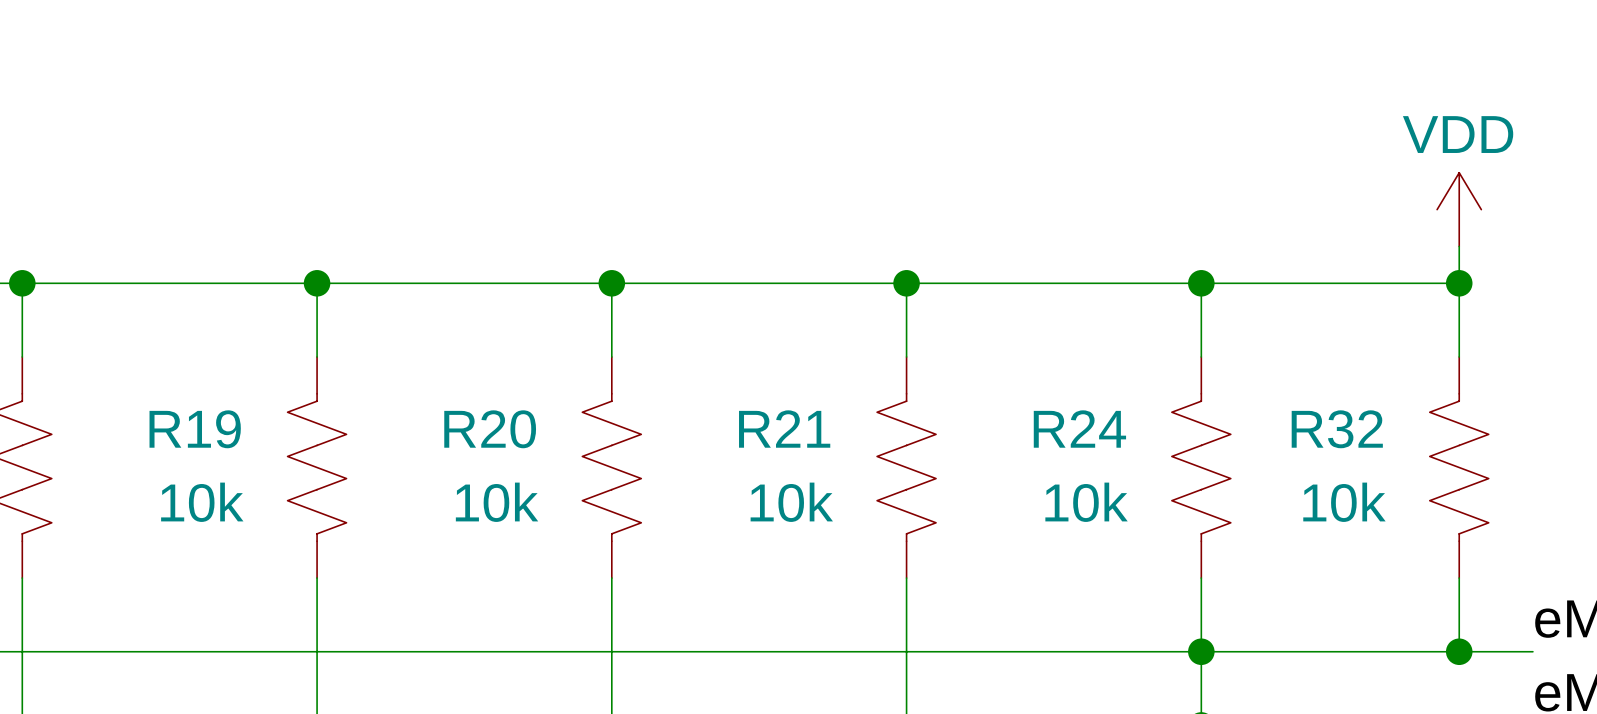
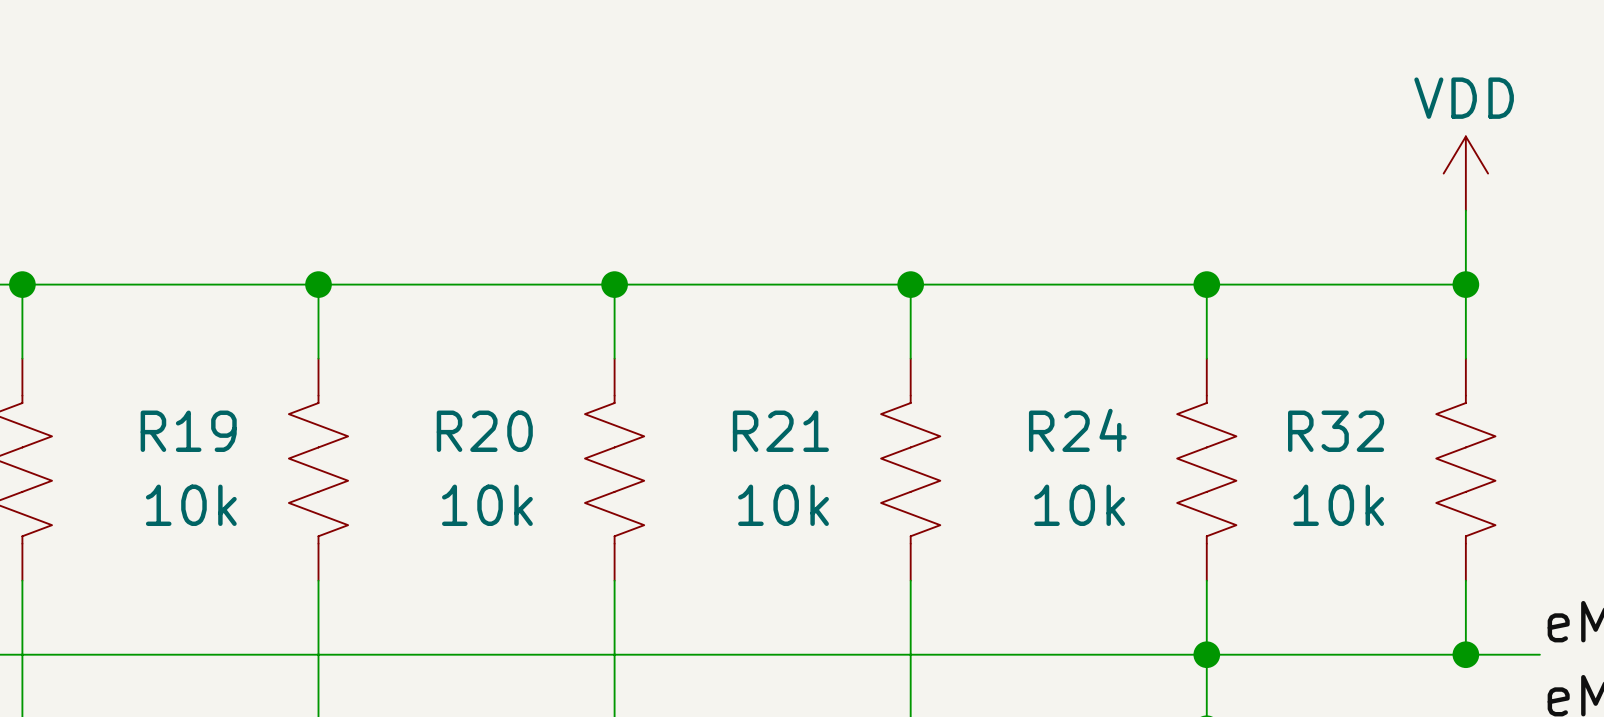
power symbol position: VDD (1459, 209) -> VDD (1465, 173)

